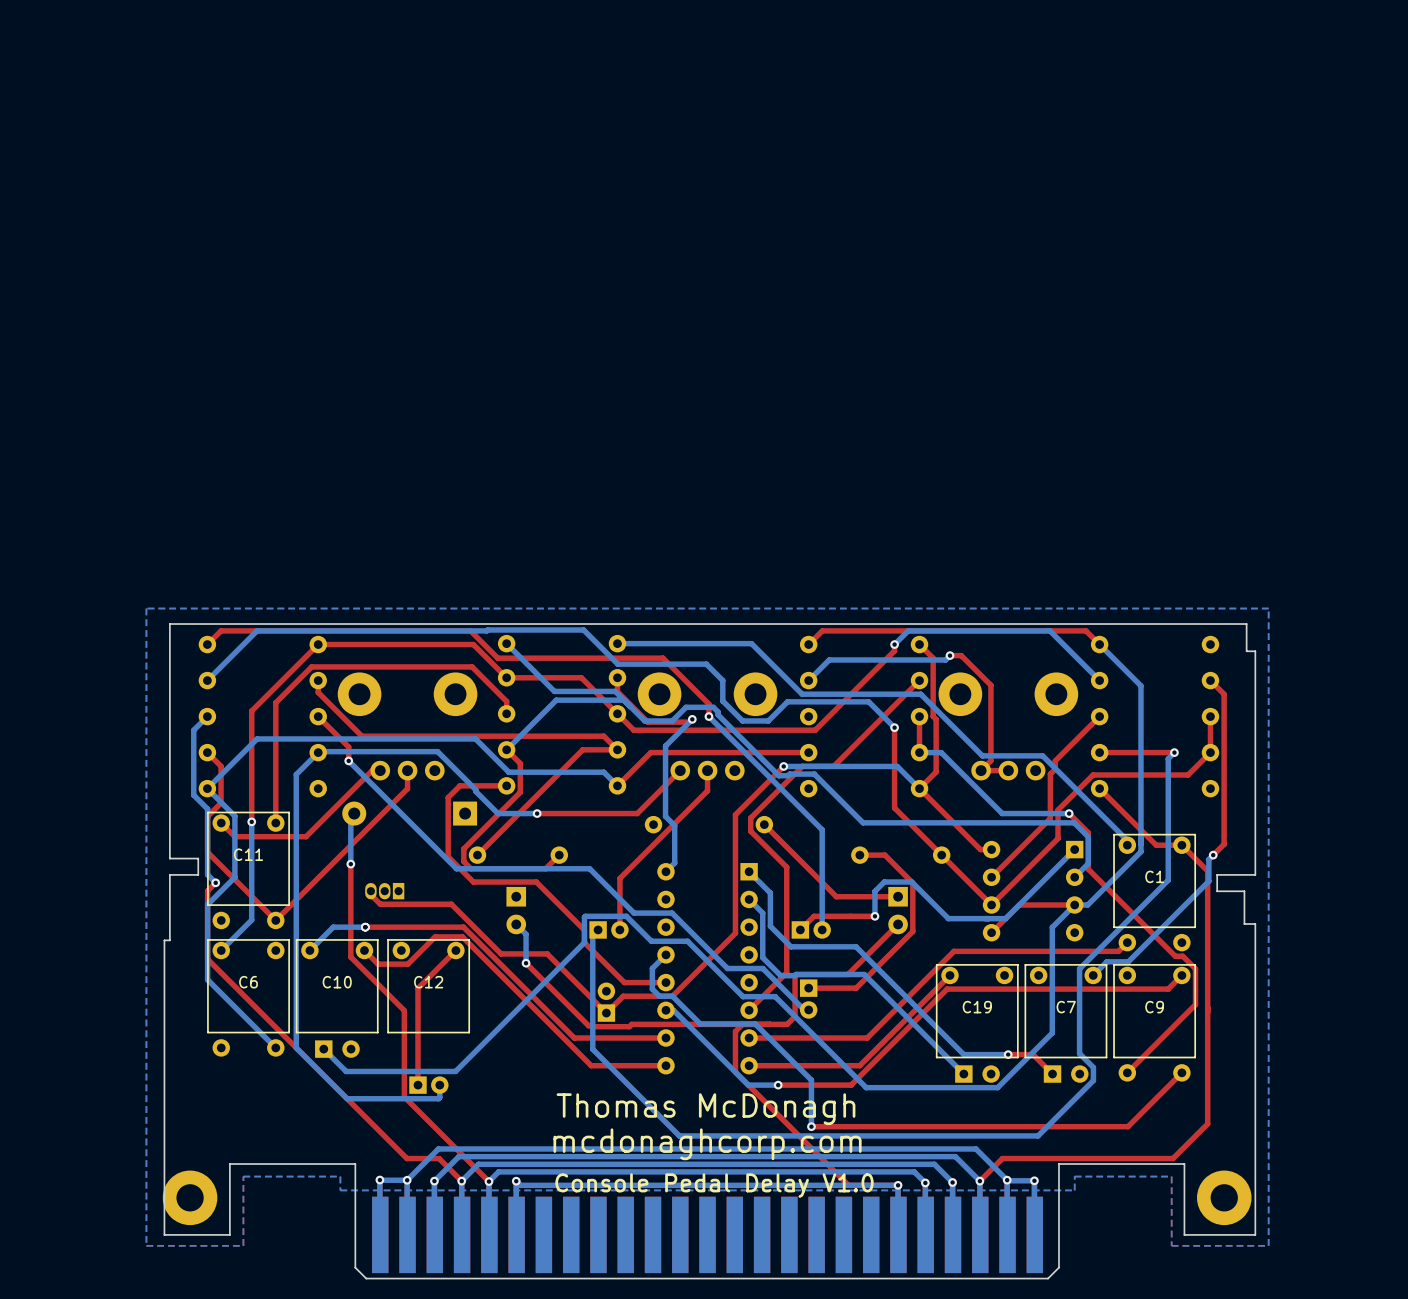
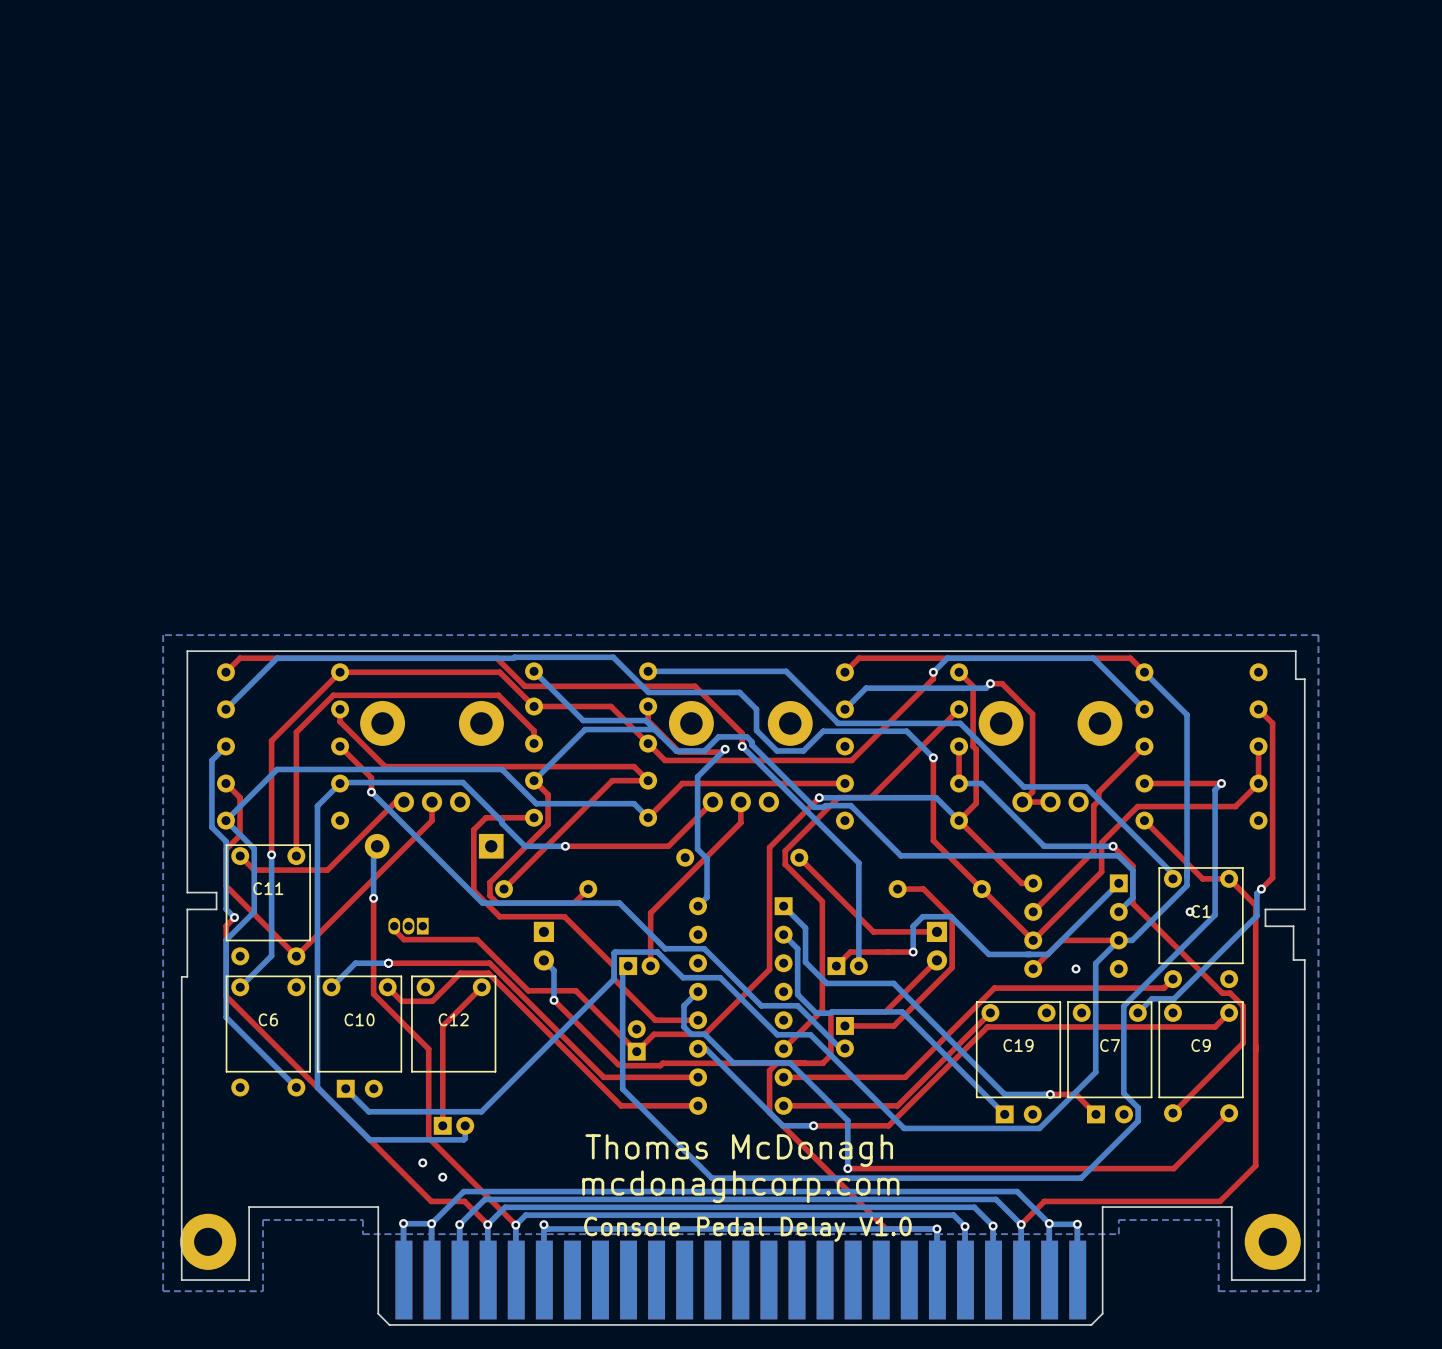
via: none -> (1190, 911)
via: none -> (1076, 968)
via: none -> (422, 1162)
via: none -> (442, 1177)

